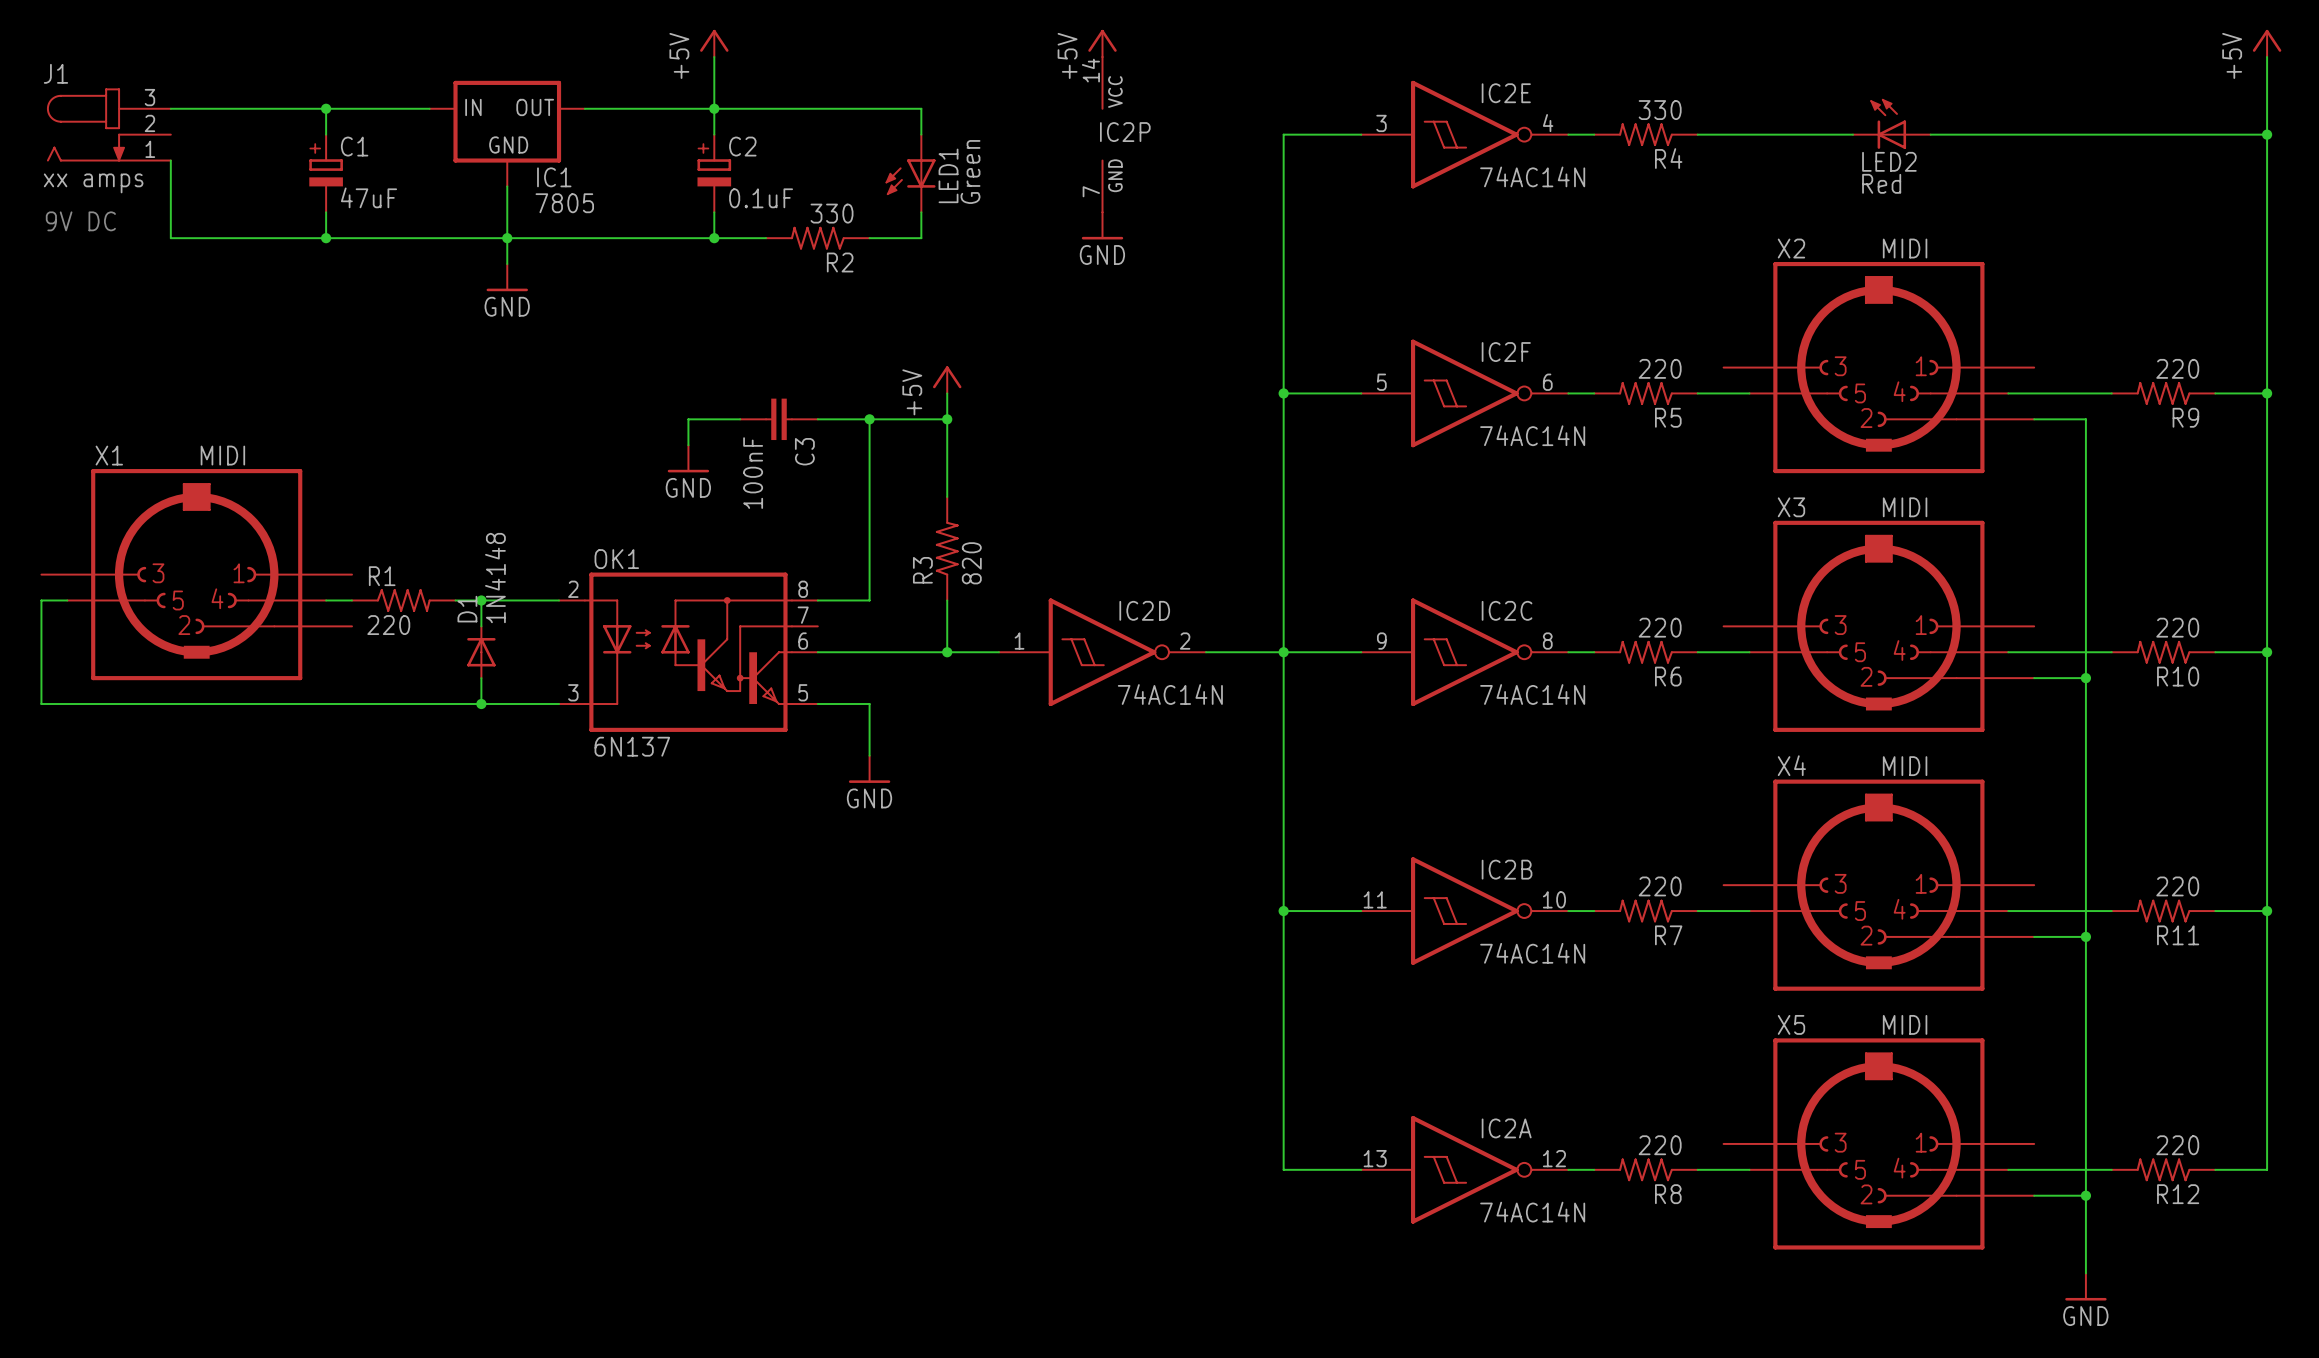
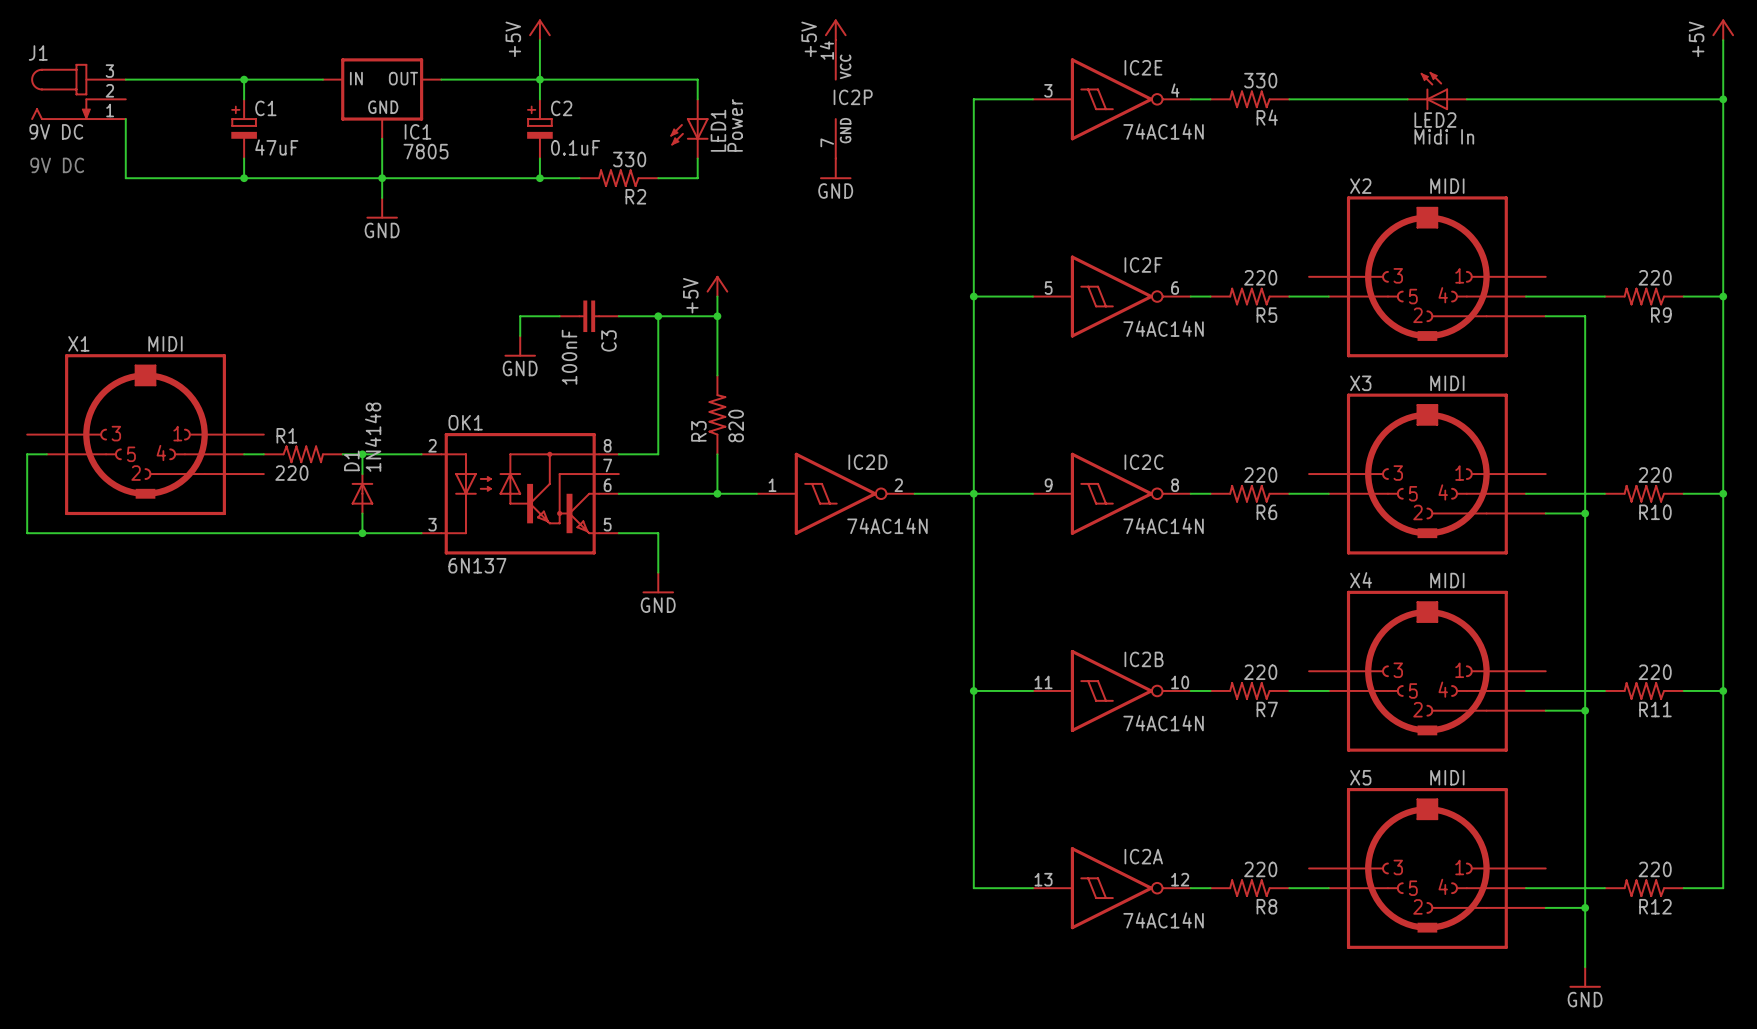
LED1 value: Green (970, 172) -> Power (735, 125)
J1 value: xx amps (93, 183) -> 9V DC (56, 131)
LED2 value: Red (1881, 183) -> Midi In (1444, 136)

